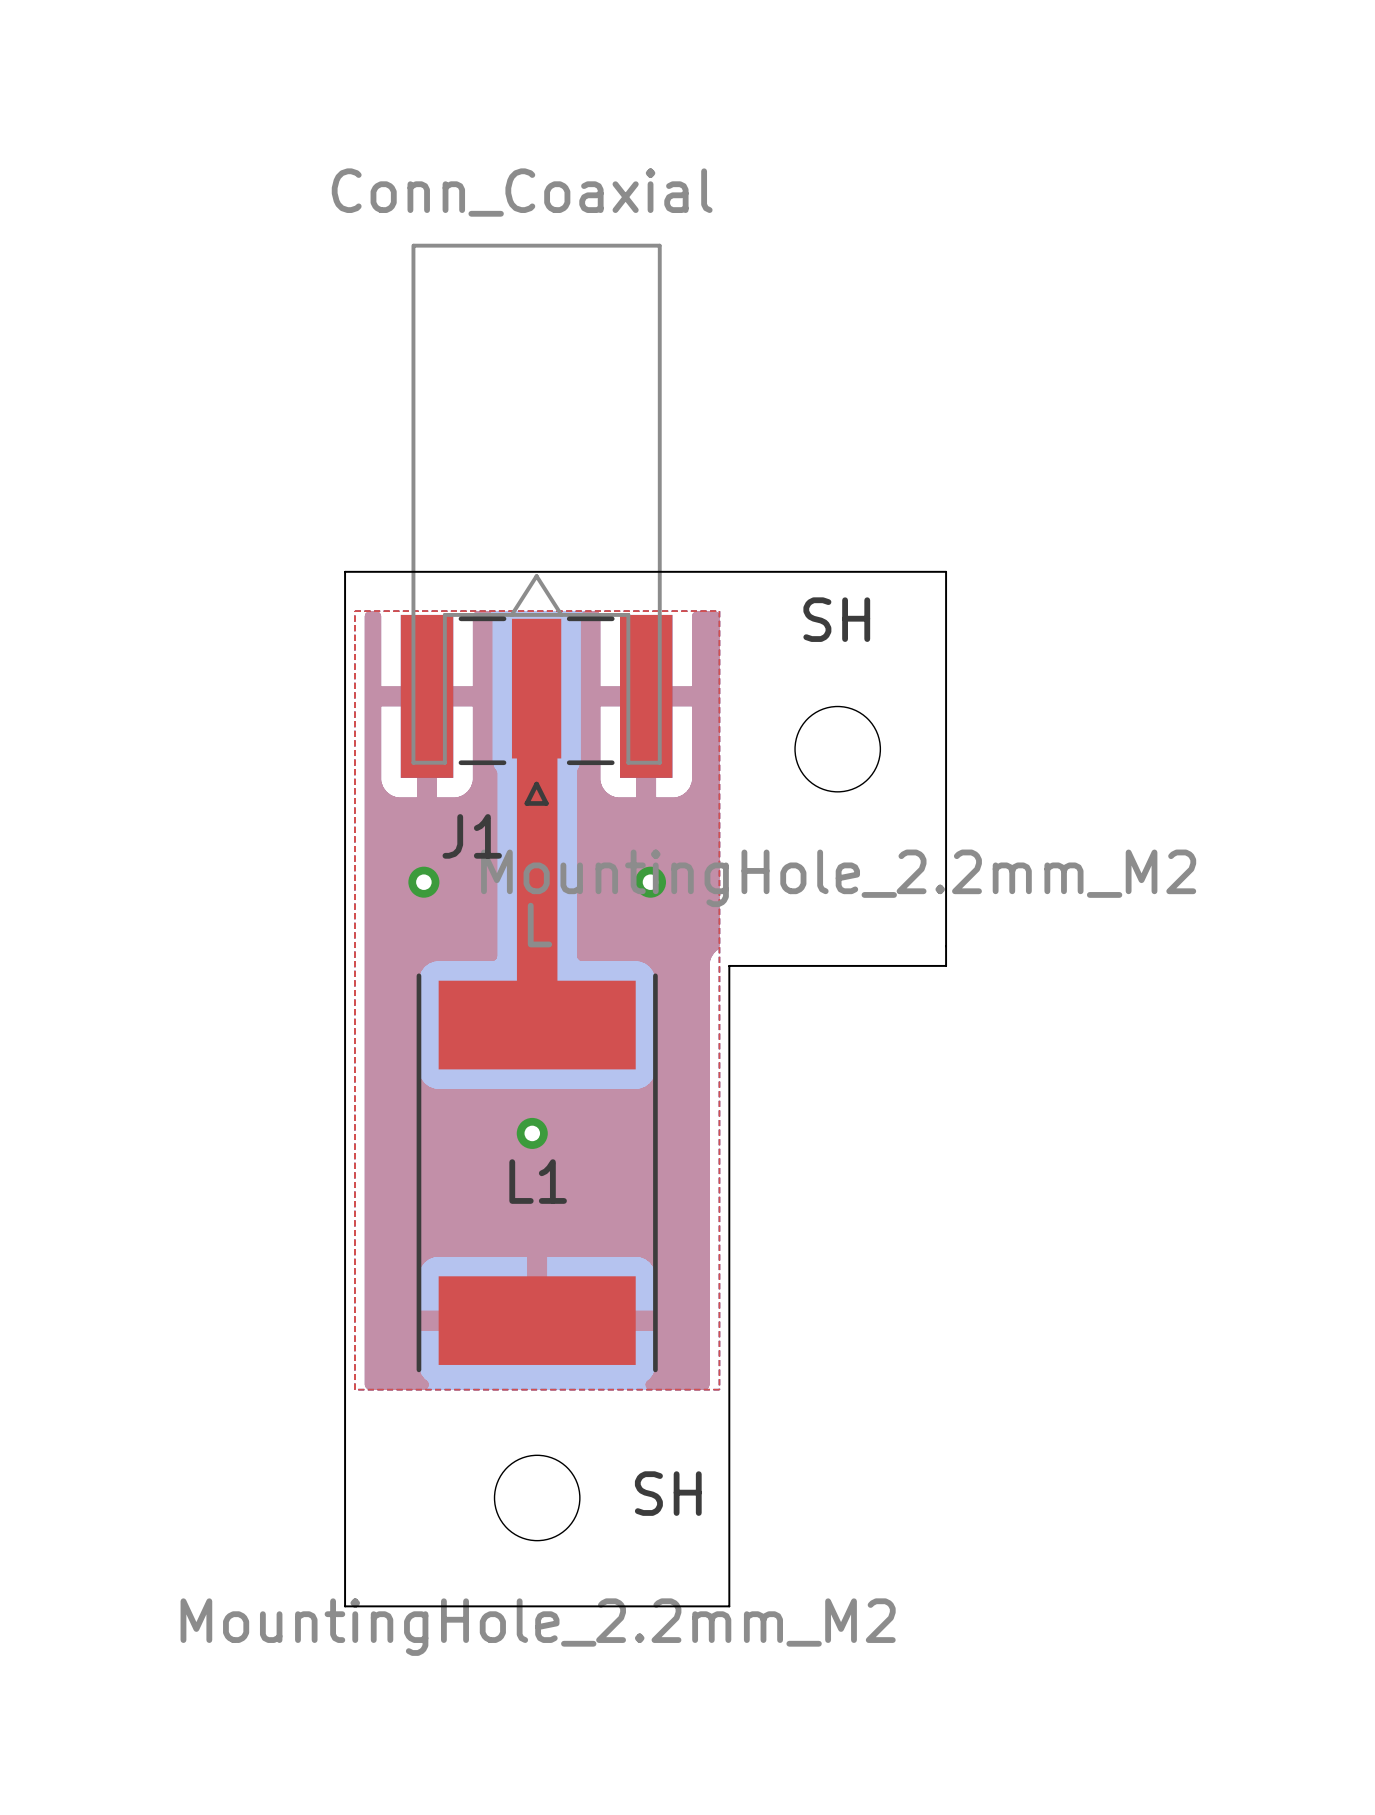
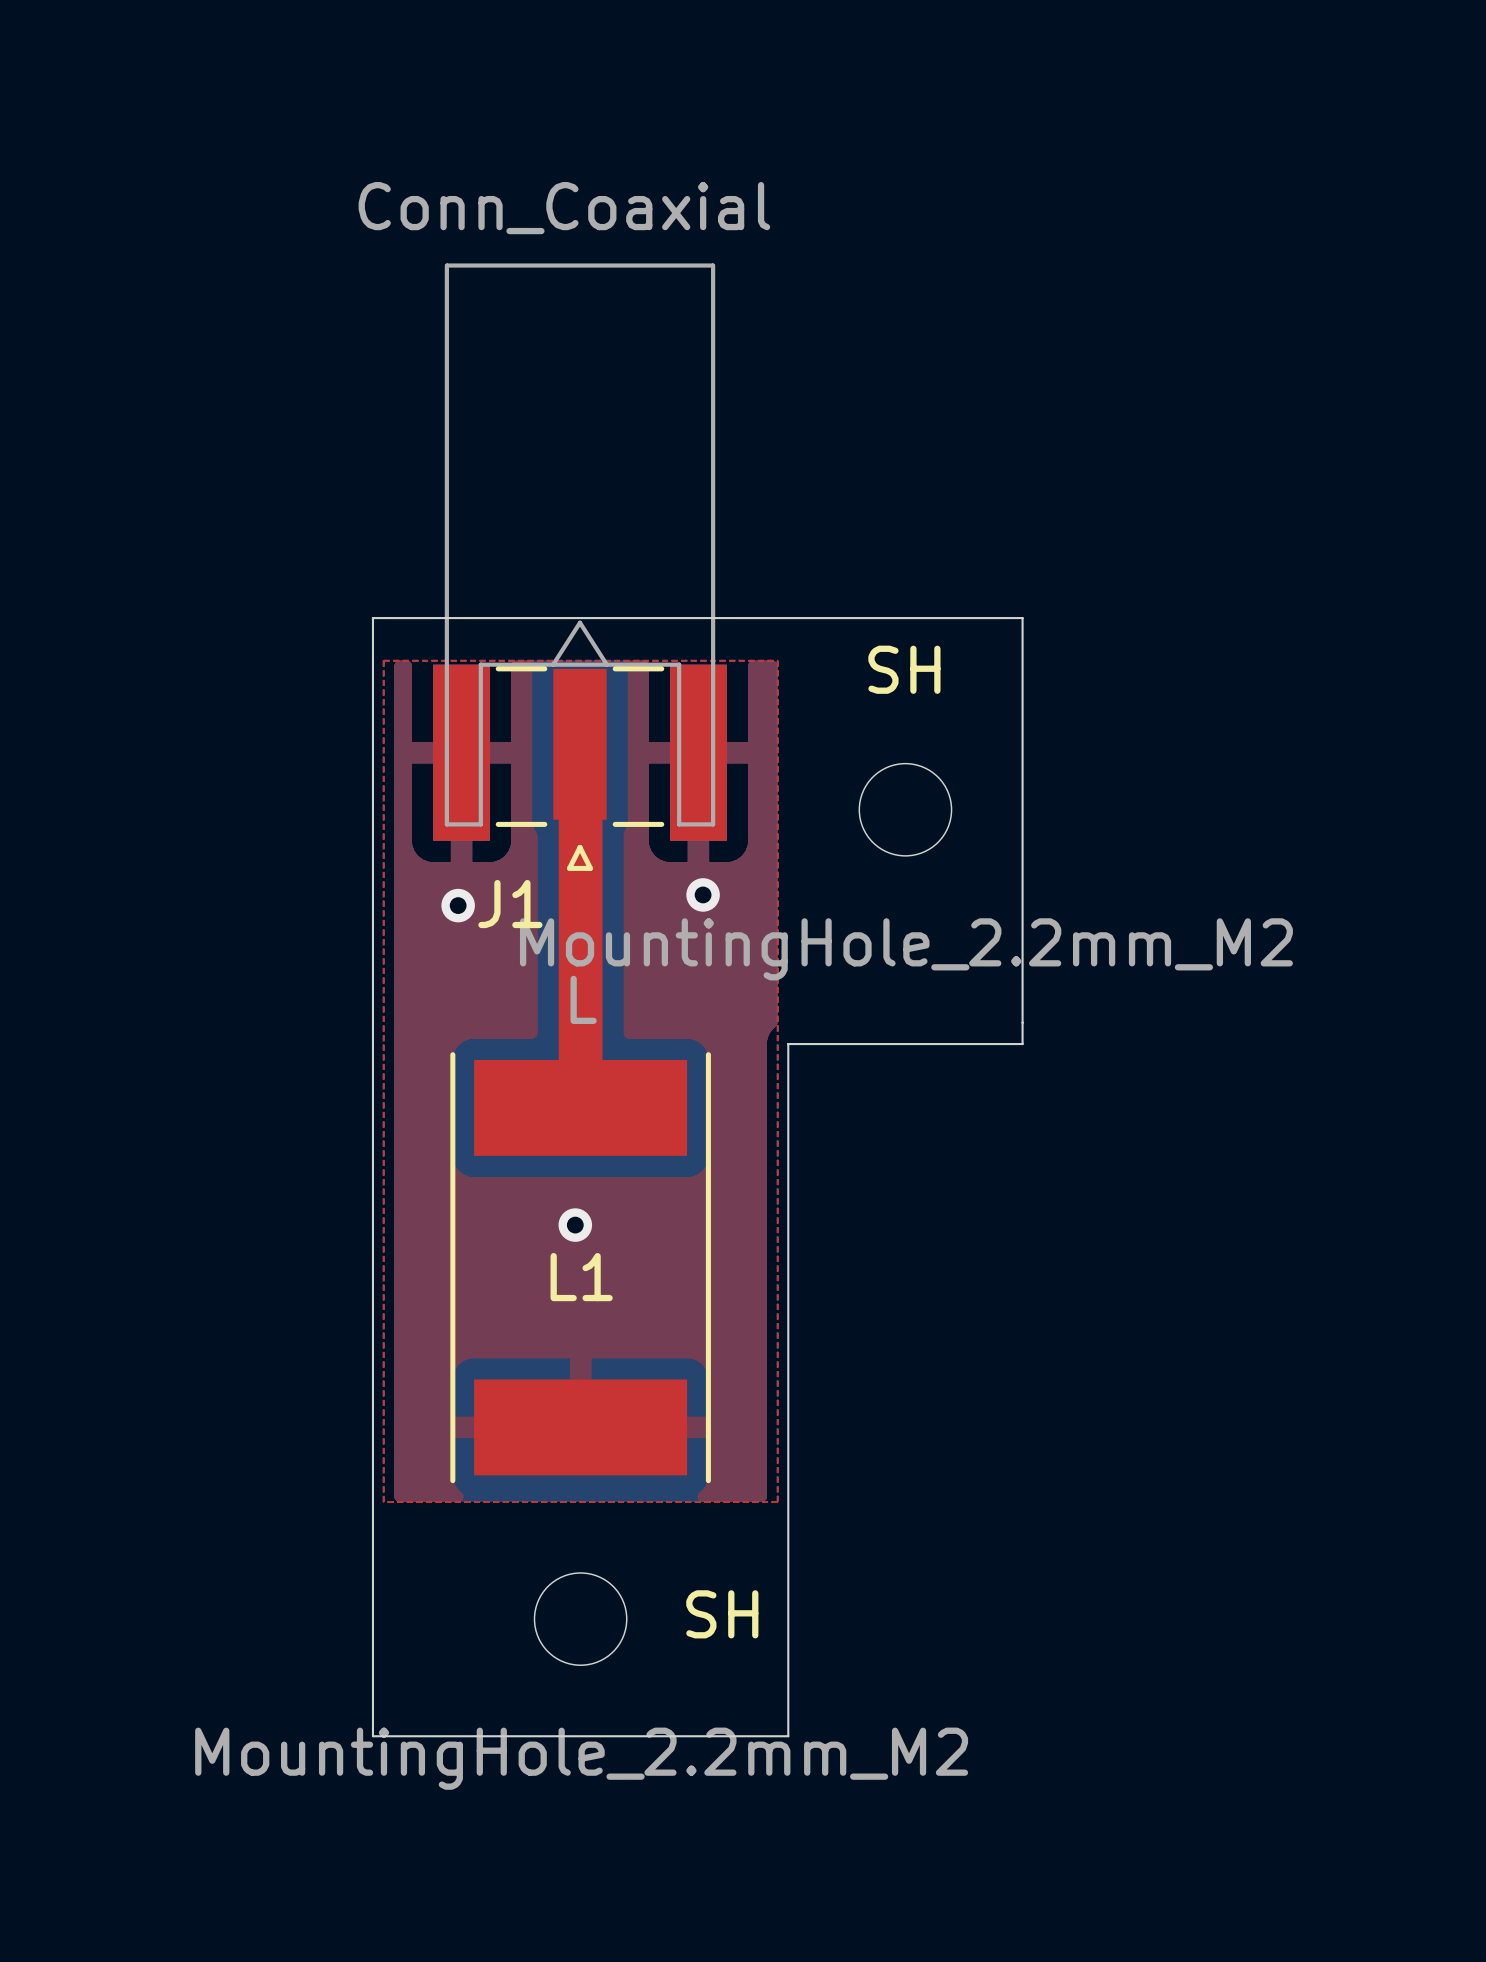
via position: (423, 882) -> (458, 905)
via position: (650, 882) -> (703, 894)

